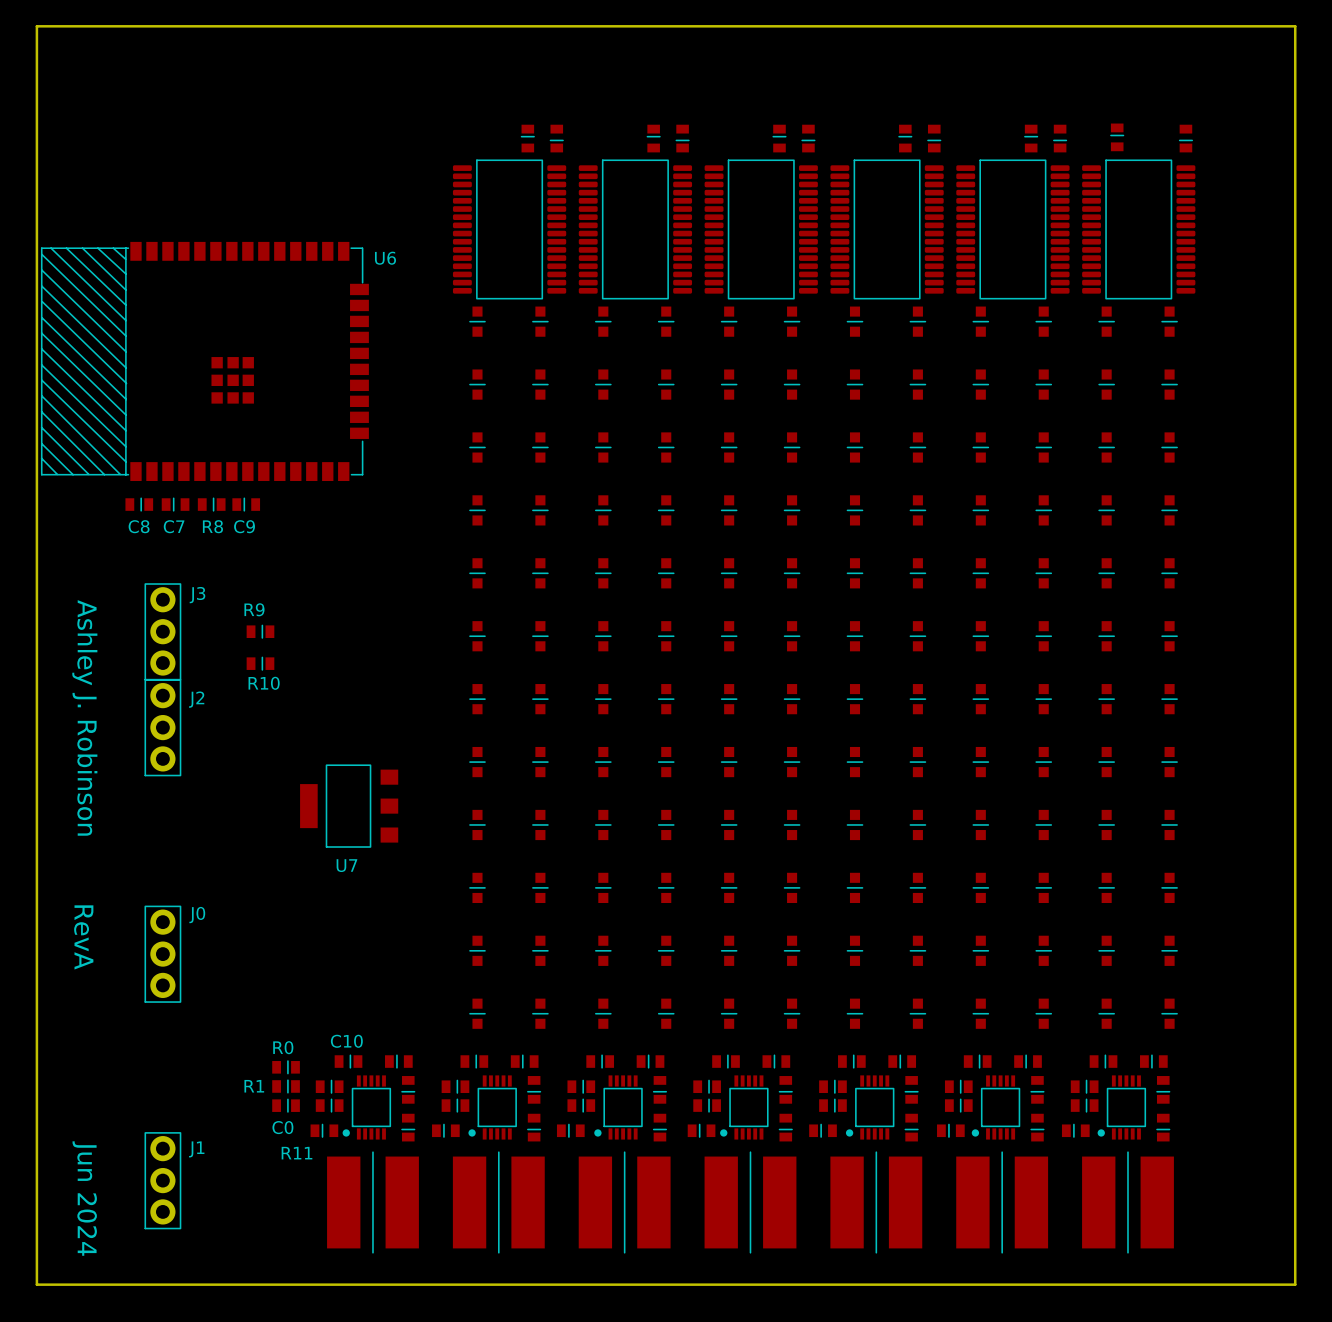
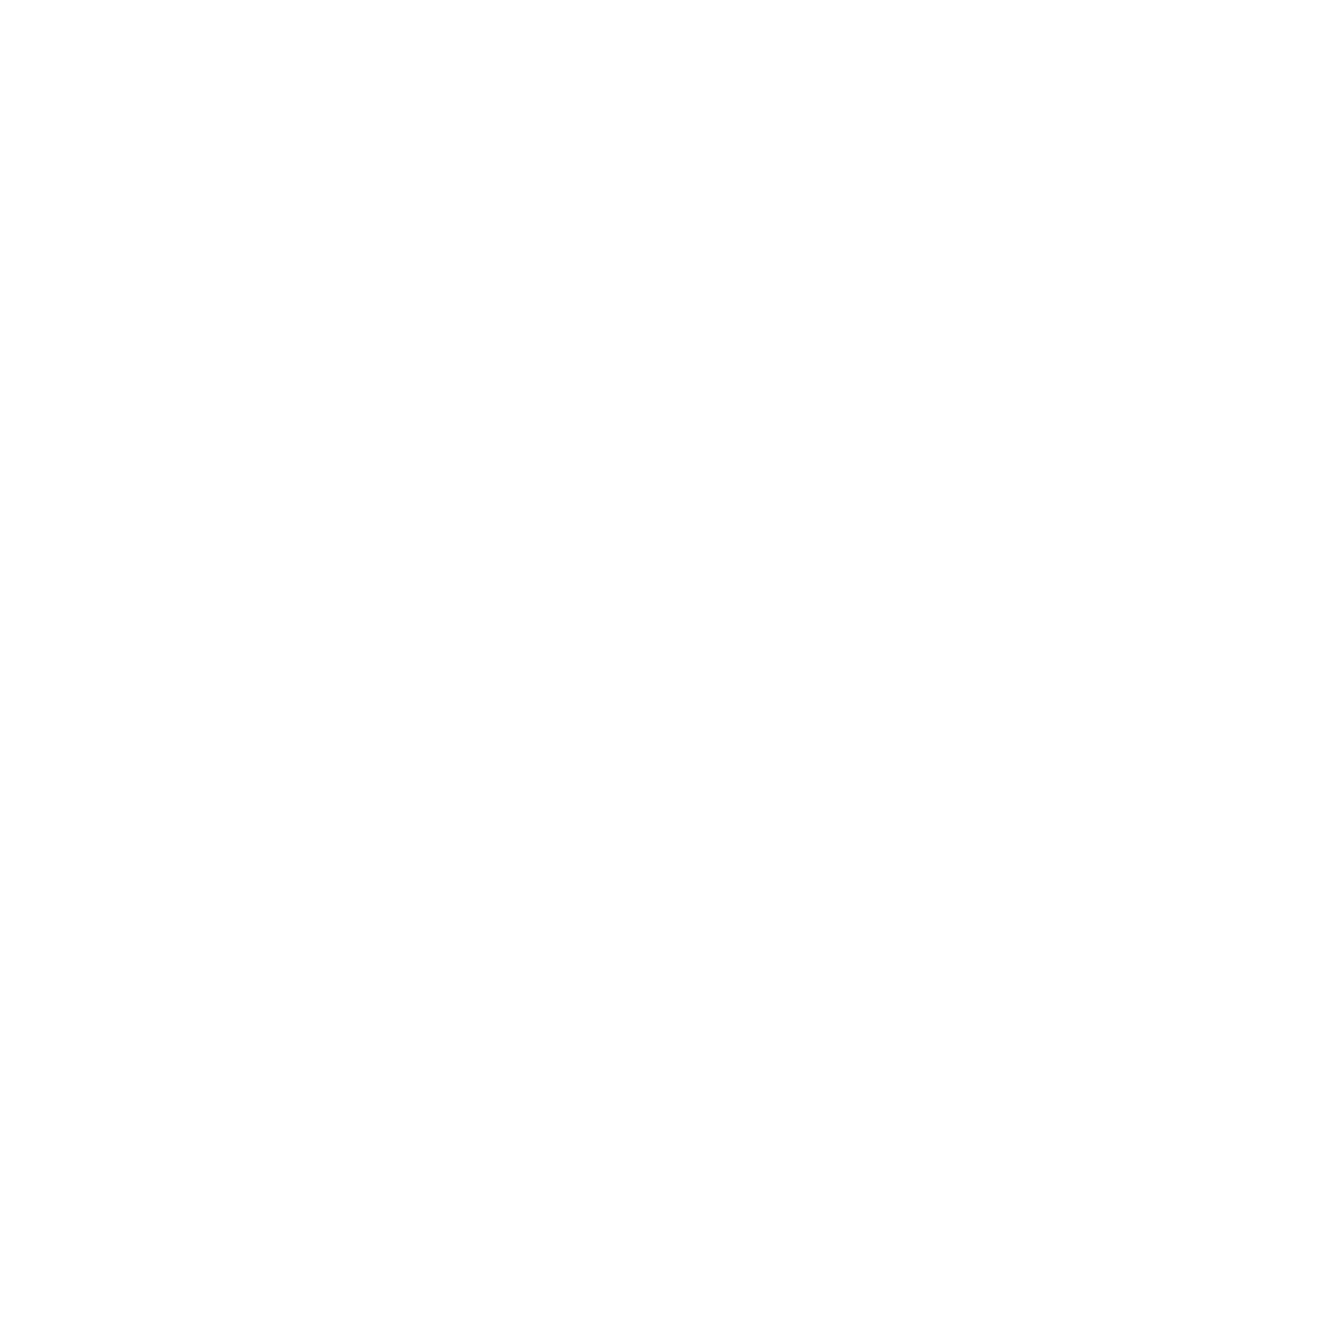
board edge: (36, 26) (1295, 26) (1295, 1284) (36, 1284) (36, 26) -> none
part: (1117, 137) -> none
part: (527, 138) -> none
part: (556, 138) -> none
part: (653, 138) -> none
part: (682, 138) -> none
part: (779, 138) -> none
part: (808, 138) -> none
part: (905, 138) -> none
part: (934, 138) -> none
part: (1031, 138) -> none
part: (1060, 138) -> none
part: (1185, 138) -> none
part: (509, 229) -> none
part: (635, 229) -> none
part: (761, 229) -> none
part: (887, 229) -> none
part: (1012, 229) -> none
part: (1138, 229) -> none
part: (477, 321) -> none
part: (540, 321) -> none
part: (603, 321) -> none
part: (666, 321) -> none
part: (729, 321) -> none
part: (792, 321) -> none
part: (854, 321) -> none
part: (917, 321) -> none
part: (980, 321) -> none
part: (1043, 321) -> none
part: (1106, 321) -> none
part: (1169, 321) -> none
U6: (204, 361) -> none
part: (477, 384) -> none
part: (540, 384) -> none
part: (603, 384) -> none
part: (666, 384) -> none
part: (729, 384) -> none
part: (792, 384) -> none
part: (854, 384) -> none
part: (917, 384) -> none
part: (980, 384) -> none
part: (1043, 384) -> none
part: (1106, 384) -> none
part: (1169, 384) -> none
part: (477, 447) -> none
part: (540, 447) -> none
part: (603, 447) -> none
part: (666, 447) -> none
part: (729, 447) -> none
part: (792, 447) -> none
part: (854, 447) -> none
part: (917, 447) -> none
part: (980, 447) -> none
part: (1043, 447) -> none
part: (1106, 447) -> none
part: (1169, 447) -> none
C8: (139, 504) -> none
C7: (175, 504) -> none
R8: (211, 504) -> none
C9: (246, 504) -> none
part: (477, 510) -> none
part: (540, 510) -> none
part: (603, 510) -> none
part: (666, 510) -> none
part: (729, 510) -> none
part: (792, 510) -> none
part: (854, 510) -> none
part: (917, 510) -> none
part: (980, 510) -> none
part: (1043, 510) -> none
part: (1106, 510) -> none
part: (1169, 510) -> none
part: (477, 573) -> none
part: (540, 573) -> none
part: (603, 573) -> none
part: (666, 573) -> none
part: (729, 573) -> none
part: (792, 573) -> none
part: (854, 573) -> none
part: (917, 573) -> none
part: (980, 573) -> none
part: (1043, 573) -> none
part: (1106, 573) -> none
part: (1169, 573) -> none
J3: (162, 631) -> none
R9: (260, 631) -> none
part: (477, 636) -> none
part: (540, 636) -> none
part: (603, 636) -> none
part: (666, 636) -> none
part: (729, 636) -> none
part: (792, 636) -> none
part: (854, 636) -> none
part: (917, 636) -> none
part: (980, 636) -> none
part: (1043, 636) -> none
part: (1106, 636) -> none
part: (1169, 636) -> none
R10: (260, 663) -> none
part: (477, 699) -> none
part: (540, 699) -> none
part: (603, 699) -> none
part: (666, 699) -> none
part: (729, 699) -> none
part: (792, 699) -> none
part: (854, 699) -> none
part: (917, 699) -> none
part: (980, 699) -> none
part: (1043, 699) -> none
part: (1106, 699) -> none
part: (1169, 699) -> none
text: Ashley J. Robinson (84, 717) -> none
J2: (162, 727) -> none
part: (477, 762) -> none
part: (540, 762) -> none
part: (603, 762) -> none
part: (666, 762) -> none
part: (729, 762) -> none
part: (792, 762) -> none
part: (854, 762) -> none
part: (917, 762) -> none
part: (980, 762) -> none
part: (1043, 762) -> none
part: (1106, 762) -> none
part: (1169, 762) -> none
U7: (349, 806) -> none
part: (477, 824) -> none
part: (540, 824) -> none
part: (603, 824) -> none
part: (666, 824) -> none
part: (729, 824) -> none
part: (792, 824) -> none
part: (854, 824) -> none
part: (917, 824) -> none
part: (980, 824) -> none
part: (1043, 824) -> none
part: (1106, 824) -> none
part: (1169, 824) -> none
part: (477, 887) -> none
part: (540, 887) -> none
part: (603, 887) -> none
part: (666, 887) -> none
part: (729, 887) -> none
part: (792, 887) -> none
part: (854, 887) -> none
part: (917, 887) -> none
part: (980, 887) -> none
part: (1043, 887) -> none
part: (1106, 887) -> none
part: (1169, 887) -> none
text: RevA (83, 937) -> none
part: (477, 950) -> none
part: (540, 950) -> none
part: (603, 950) -> none
part: (666, 950) -> none
part: (729, 950) -> none
part: (792, 950) -> none
part: (854, 950) -> none
part: (917, 950) -> none
part: (980, 950) -> none
part: (1043, 950) -> none
part: (1106, 950) -> none
part: (1169, 950) -> none
J0: (162, 954) -> none
part: (477, 1013) -> none
part: (540, 1013) -> none
part: (603, 1013) -> none
part: (666, 1013) -> none
part: (729, 1013) -> none
part: (792, 1013) -> none
part: (854, 1013) -> none
part: (917, 1013) -> none
part: (980, 1013) -> none
part: (1043, 1013) -> none
part: (1106, 1013) -> none
part: (1169, 1013) -> none
C10: (348, 1061) -> none
part: (398, 1061) -> none
part: (474, 1061) -> none
part: (524, 1061) -> none
part: (600, 1061) -> none
part: (650, 1061) -> none
part: (726, 1061) -> none
part: (776, 1061) -> none
part: (851, 1061) -> none
part: (902, 1061) -> none
part: (977, 1061) -> none
part: (1028, 1061) -> none
part: (1103, 1061) -> none
part: (1153, 1061) -> none
R0: (286, 1067) -> none
R1: (286, 1086) -> none
part: (329, 1086) -> none
part: (455, 1086) -> none
part: (581, 1086) -> none
part: (707, 1086) -> none
part: (832, 1086) -> none
part: (958, 1086) -> none
part: (1084, 1086) -> none
part: (408, 1089) -> none
part: (534, 1089) -> none
part: (659, 1089) -> none
part: (785, 1089) -> none
part: (911, 1089) -> none
part: (1037, 1089) -> none
part: (1163, 1089) -> none
C0: (286, 1105) -> none
part: (329, 1105) -> none
part: (455, 1105) -> none
part: (581, 1105) -> none
part: (707, 1105) -> none
part: (832, 1105) -> none
part: (958, 1105) -> none
part: (1084, 1105) -> none
part: (366, 1107) -> none
part: (492, 1107) -> none
part: (618, 1107) -> none
part: (744, 1107) -> none
part: (870, 1107) -> none
part: (996, 1107) -> none
part: (1121, 1107) -> none
part: (408, 1127) -> none
part: (534, 1127) -> none
part: (659, 1127) -> none
part: (785, 1127) -> none
part: (911, 1127) -> none
part: (1037, 1127) -> none
part: (1163, 1127) -> none
R11: (324, 1130) -> none
part: (445, 1130) -> none
part: (570, 1130) -> none
part: (701, 1130) -> none
part: (823, 1130) -> none
part: (950, 1130) -> none
part: (1075, 1130) -> none
J1: (162, 1180) -> none
text: Jun 2024 (84, 1198) -> none
part: (372, 1202) -> none
part: (498, 1202) -> none
part: (624, 1202) -> none
part: (750, 1202) -> none
part: (876, 1202) -> none
part: (1002, 1202) -> none
part: (1127, 1202) -> none

